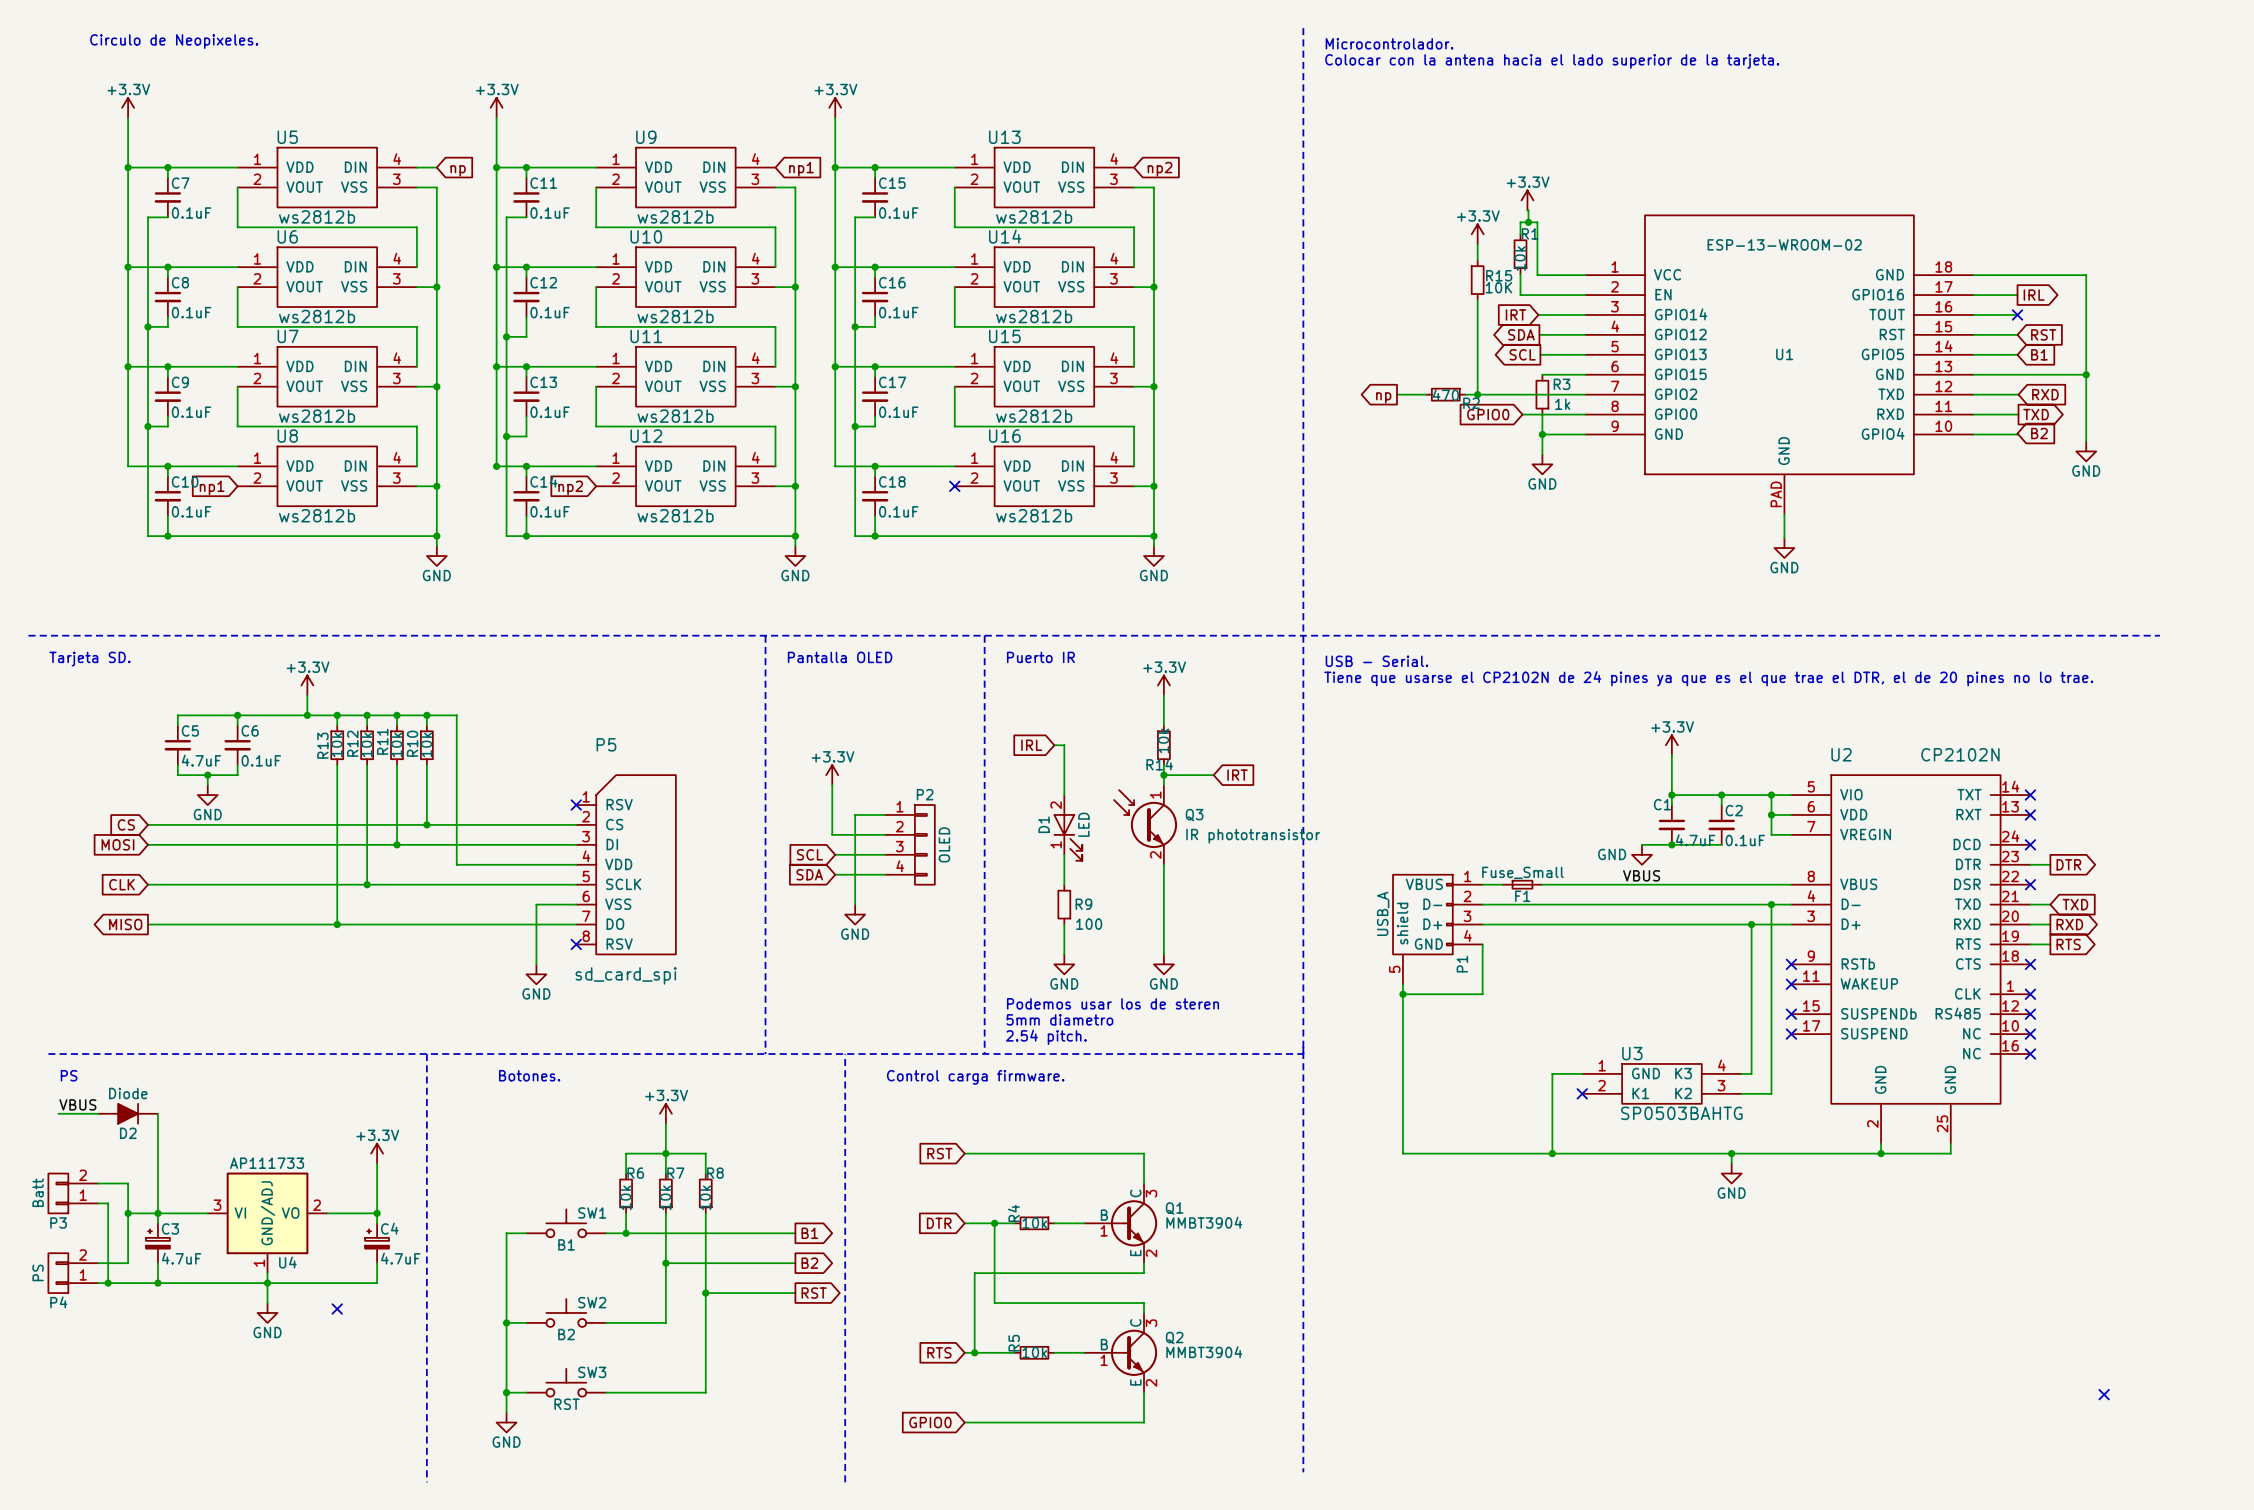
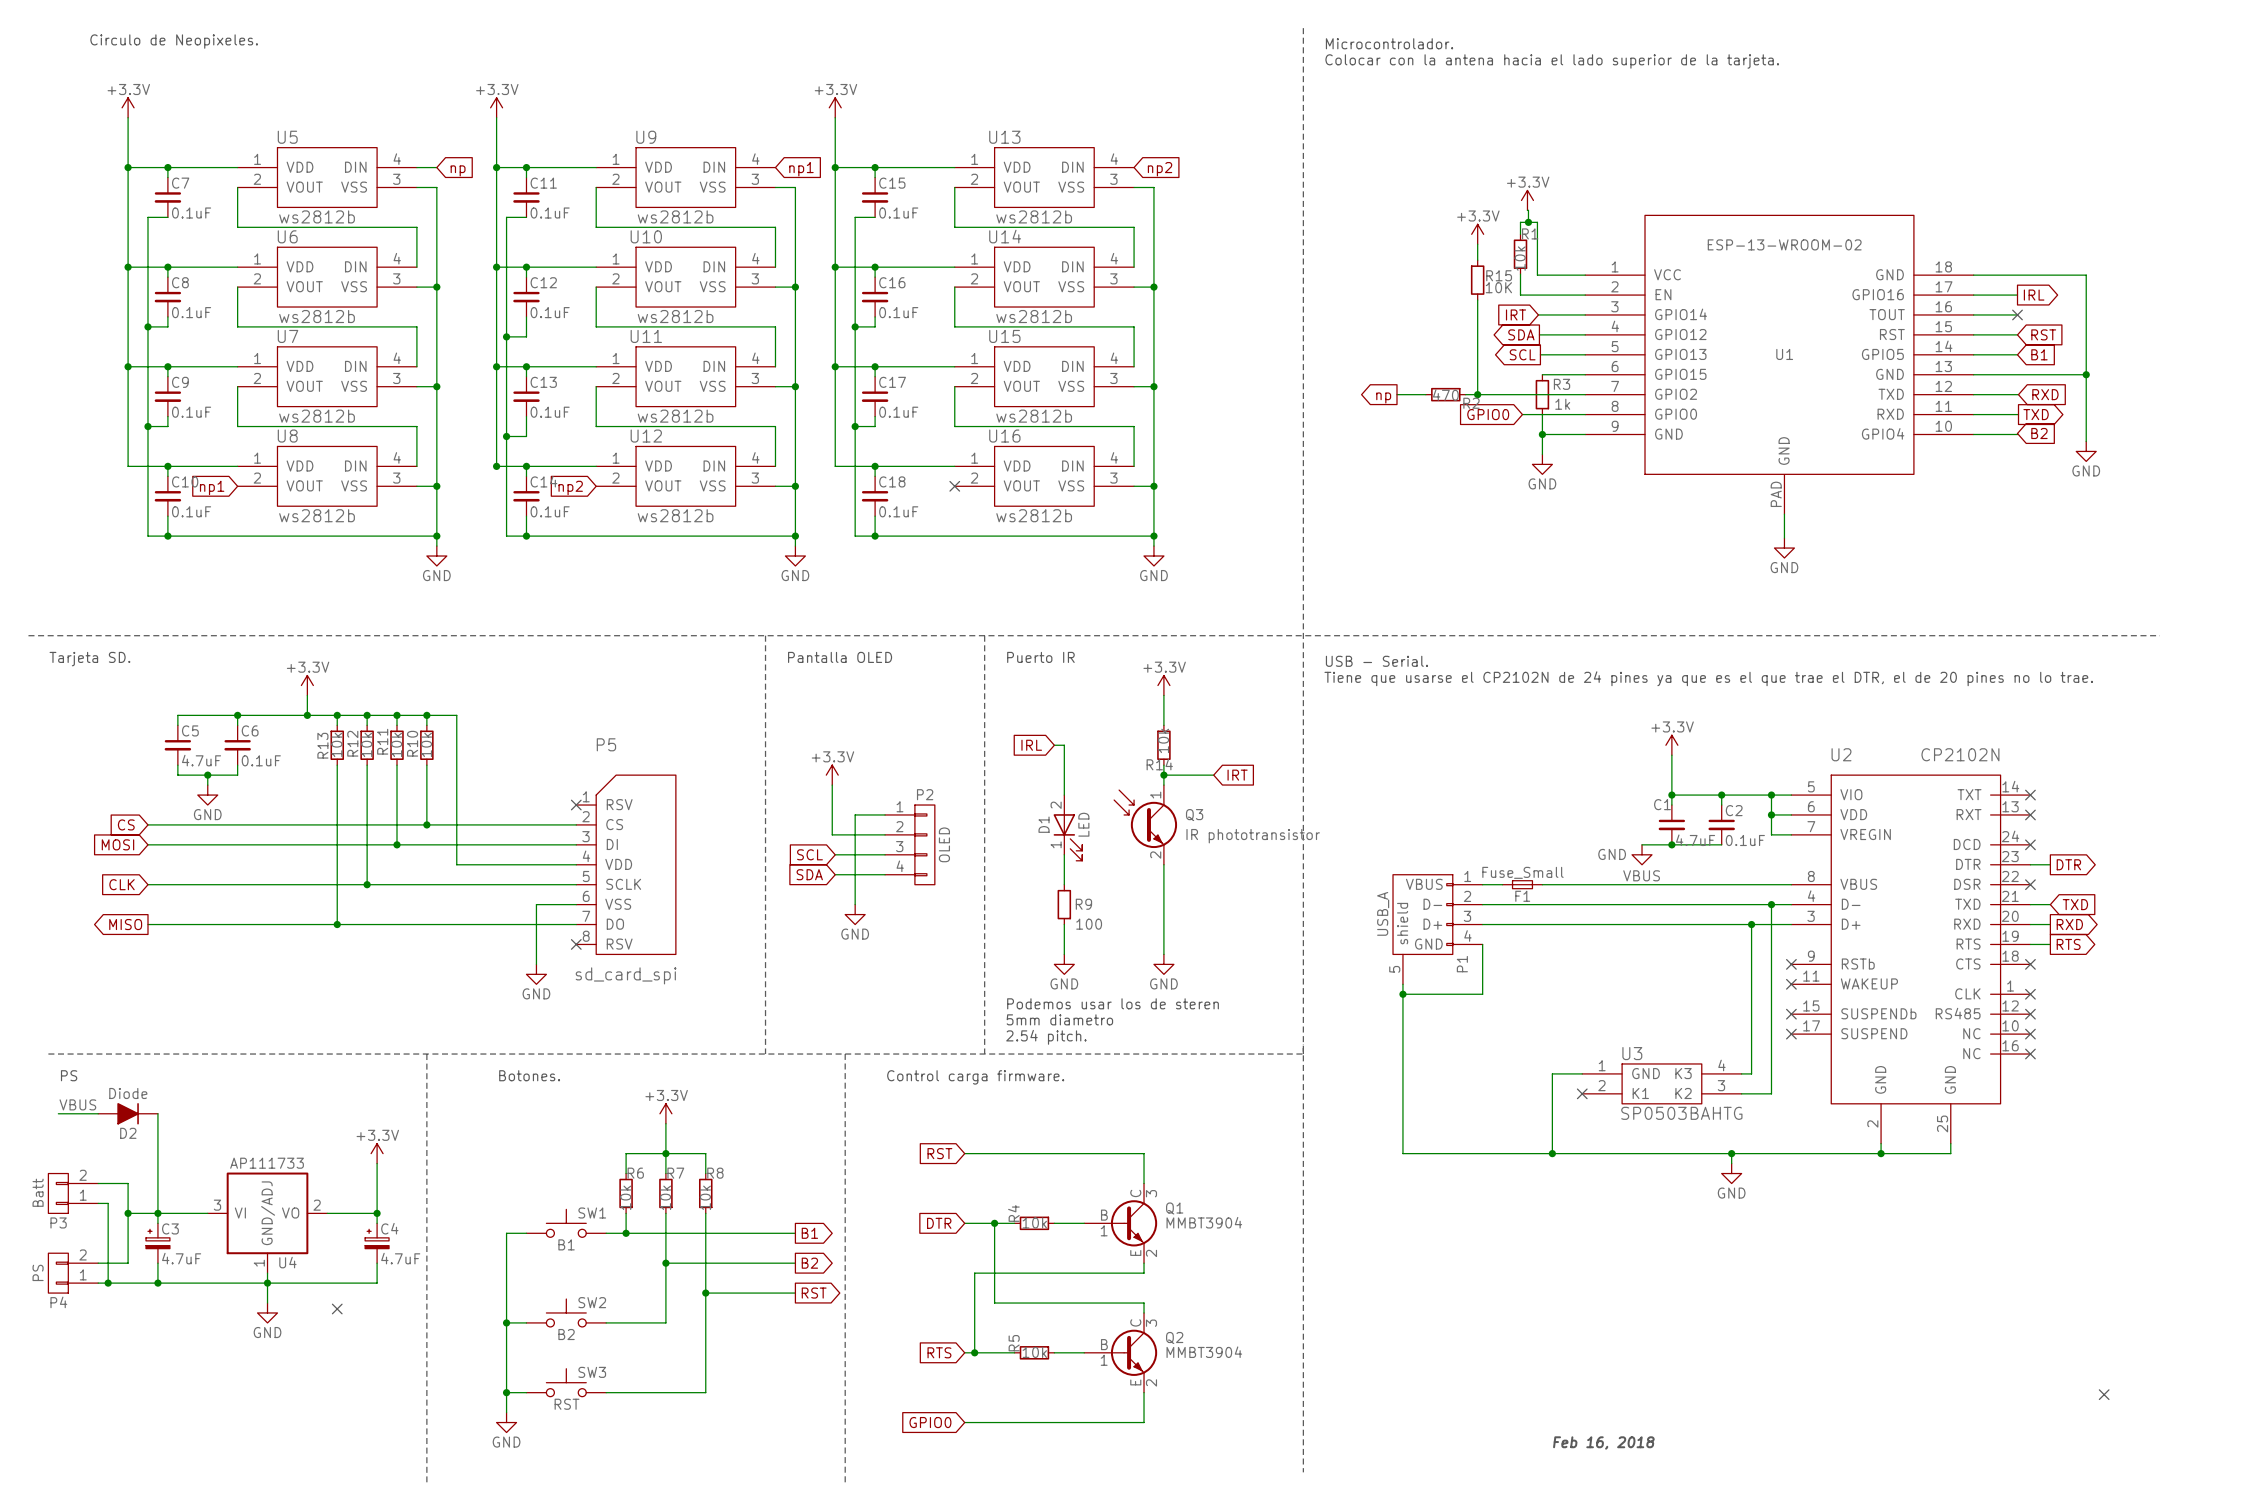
text: none -> Feb 16, 2018 (1603, 1442)

